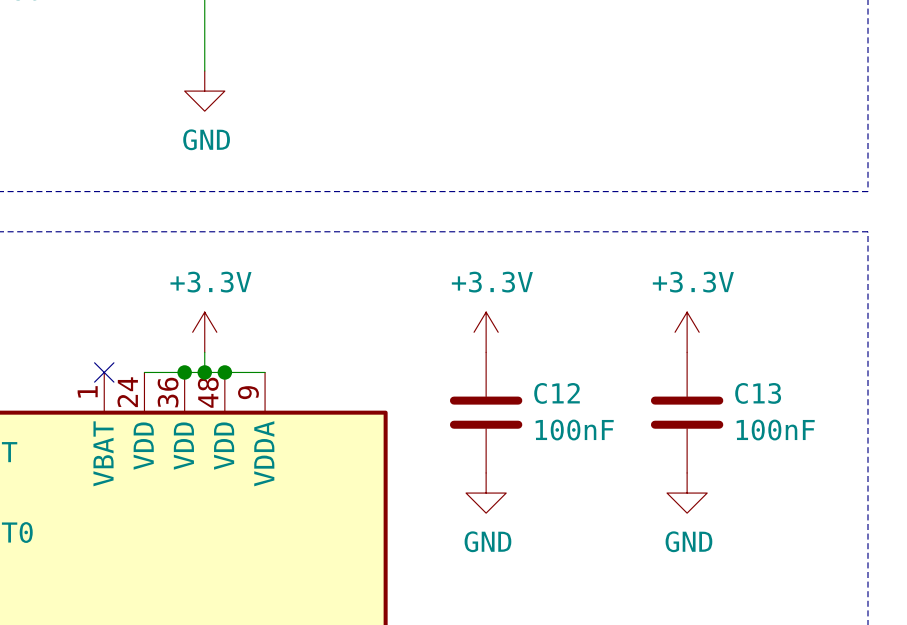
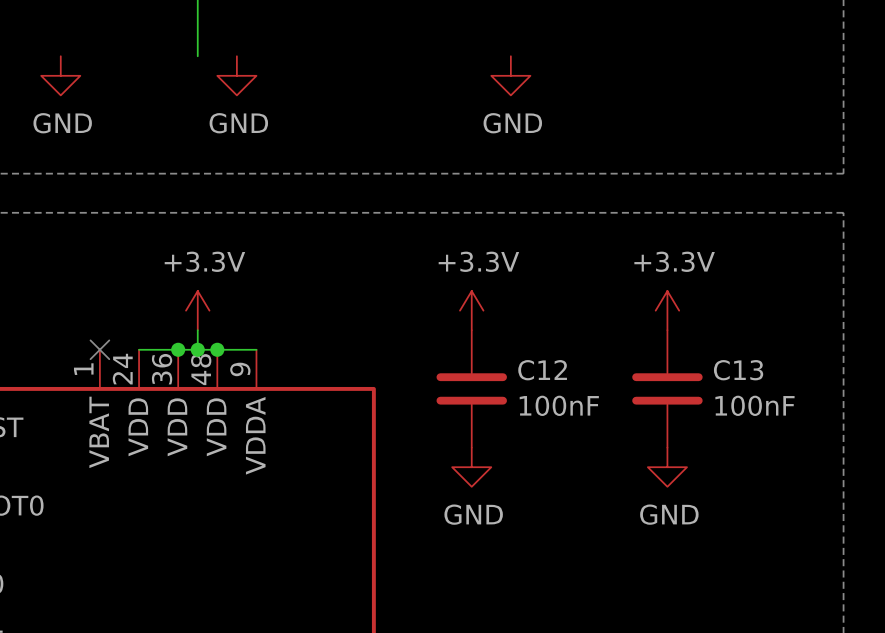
power symbol: none -> GND (60, 75)
power symbol position: GND (204, 91) -> GND (236, 75)
power symbol: none -> GND (510, 75)

